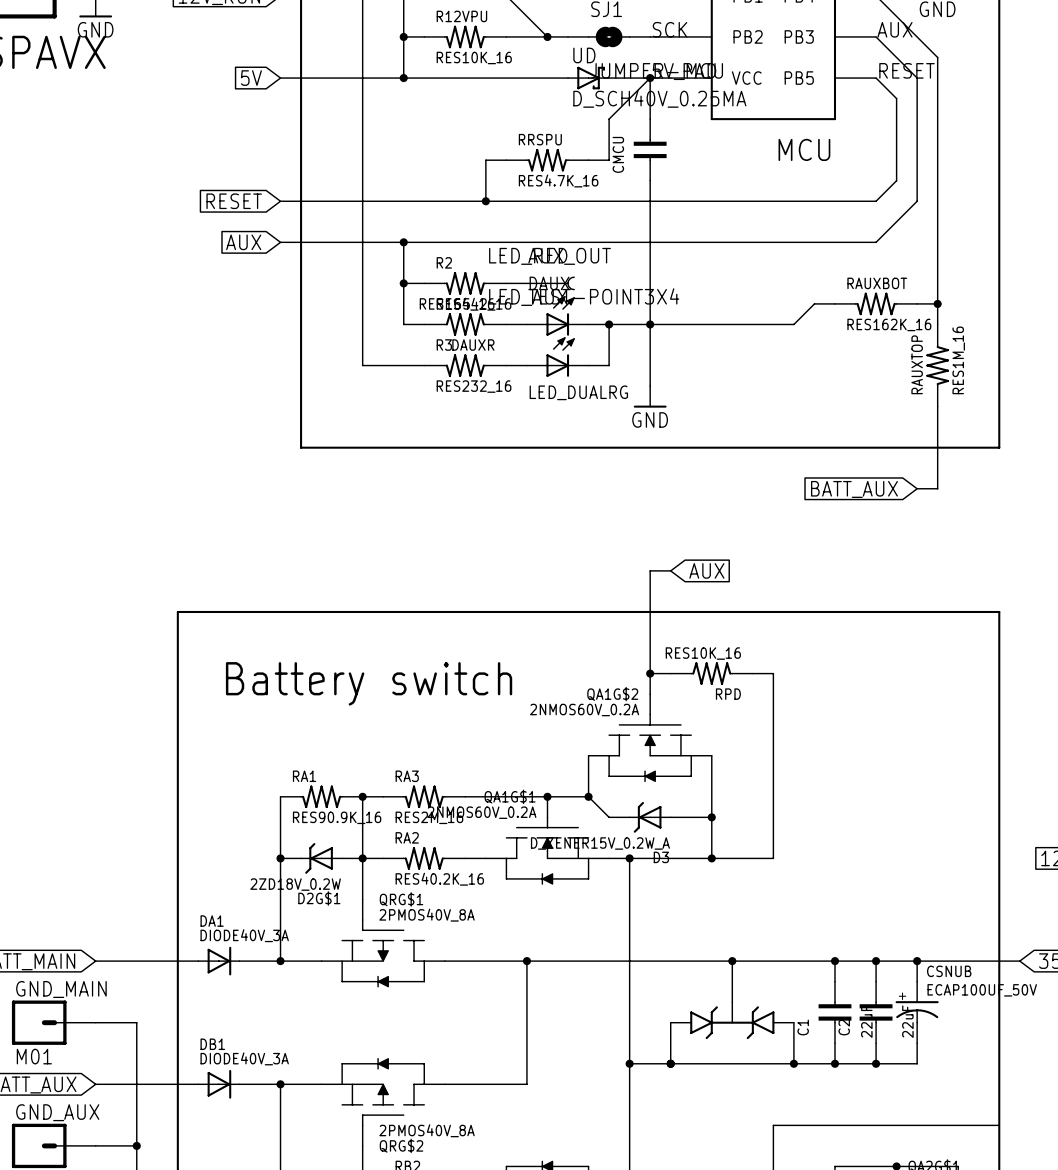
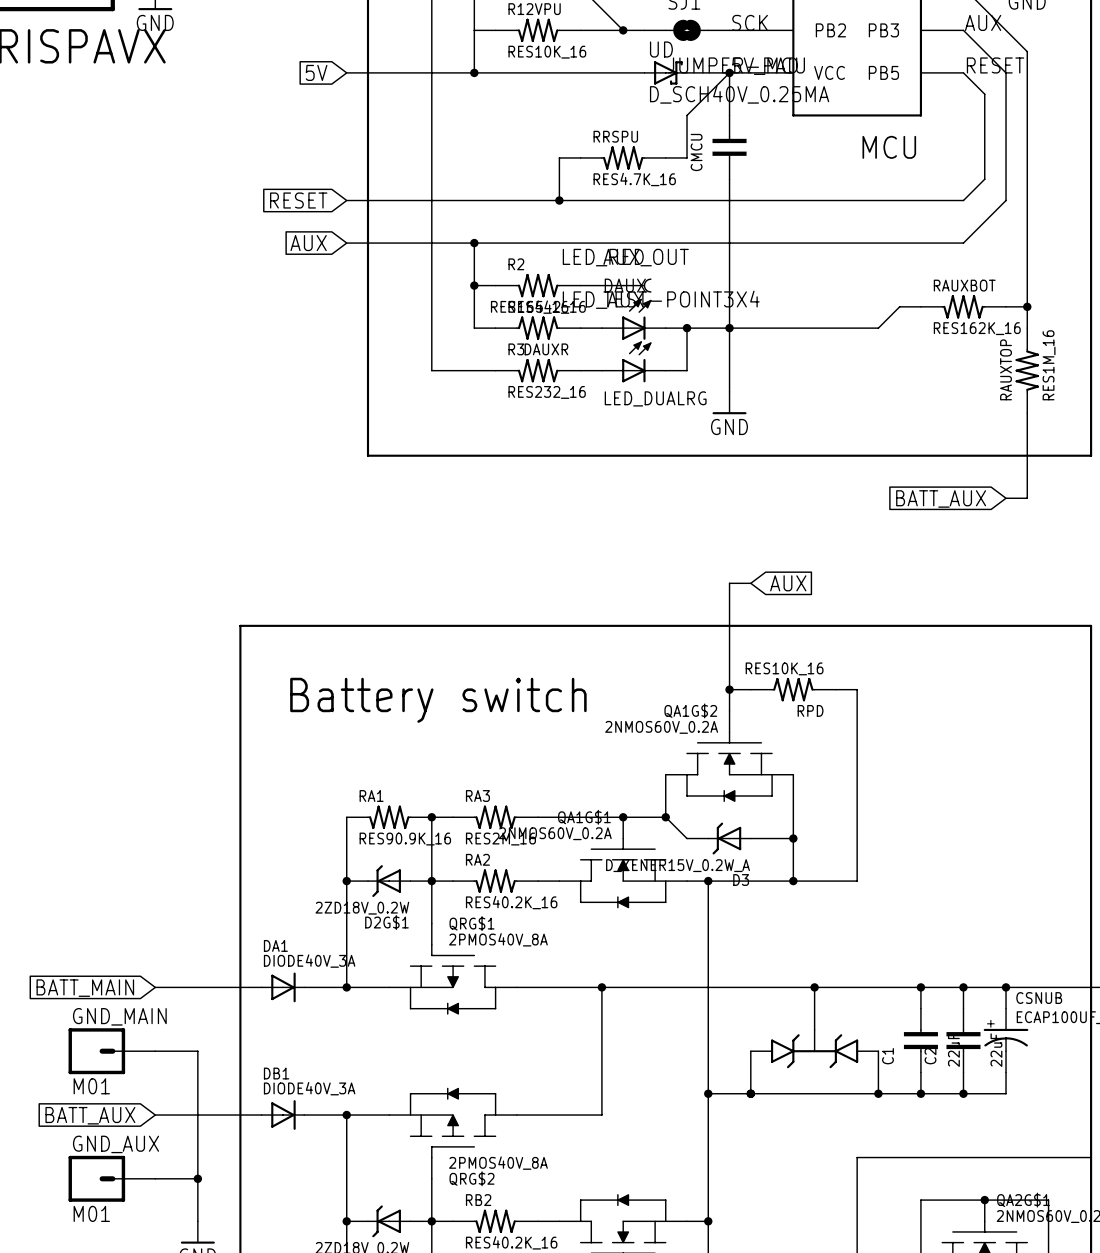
junction: (403, 36) -> none

